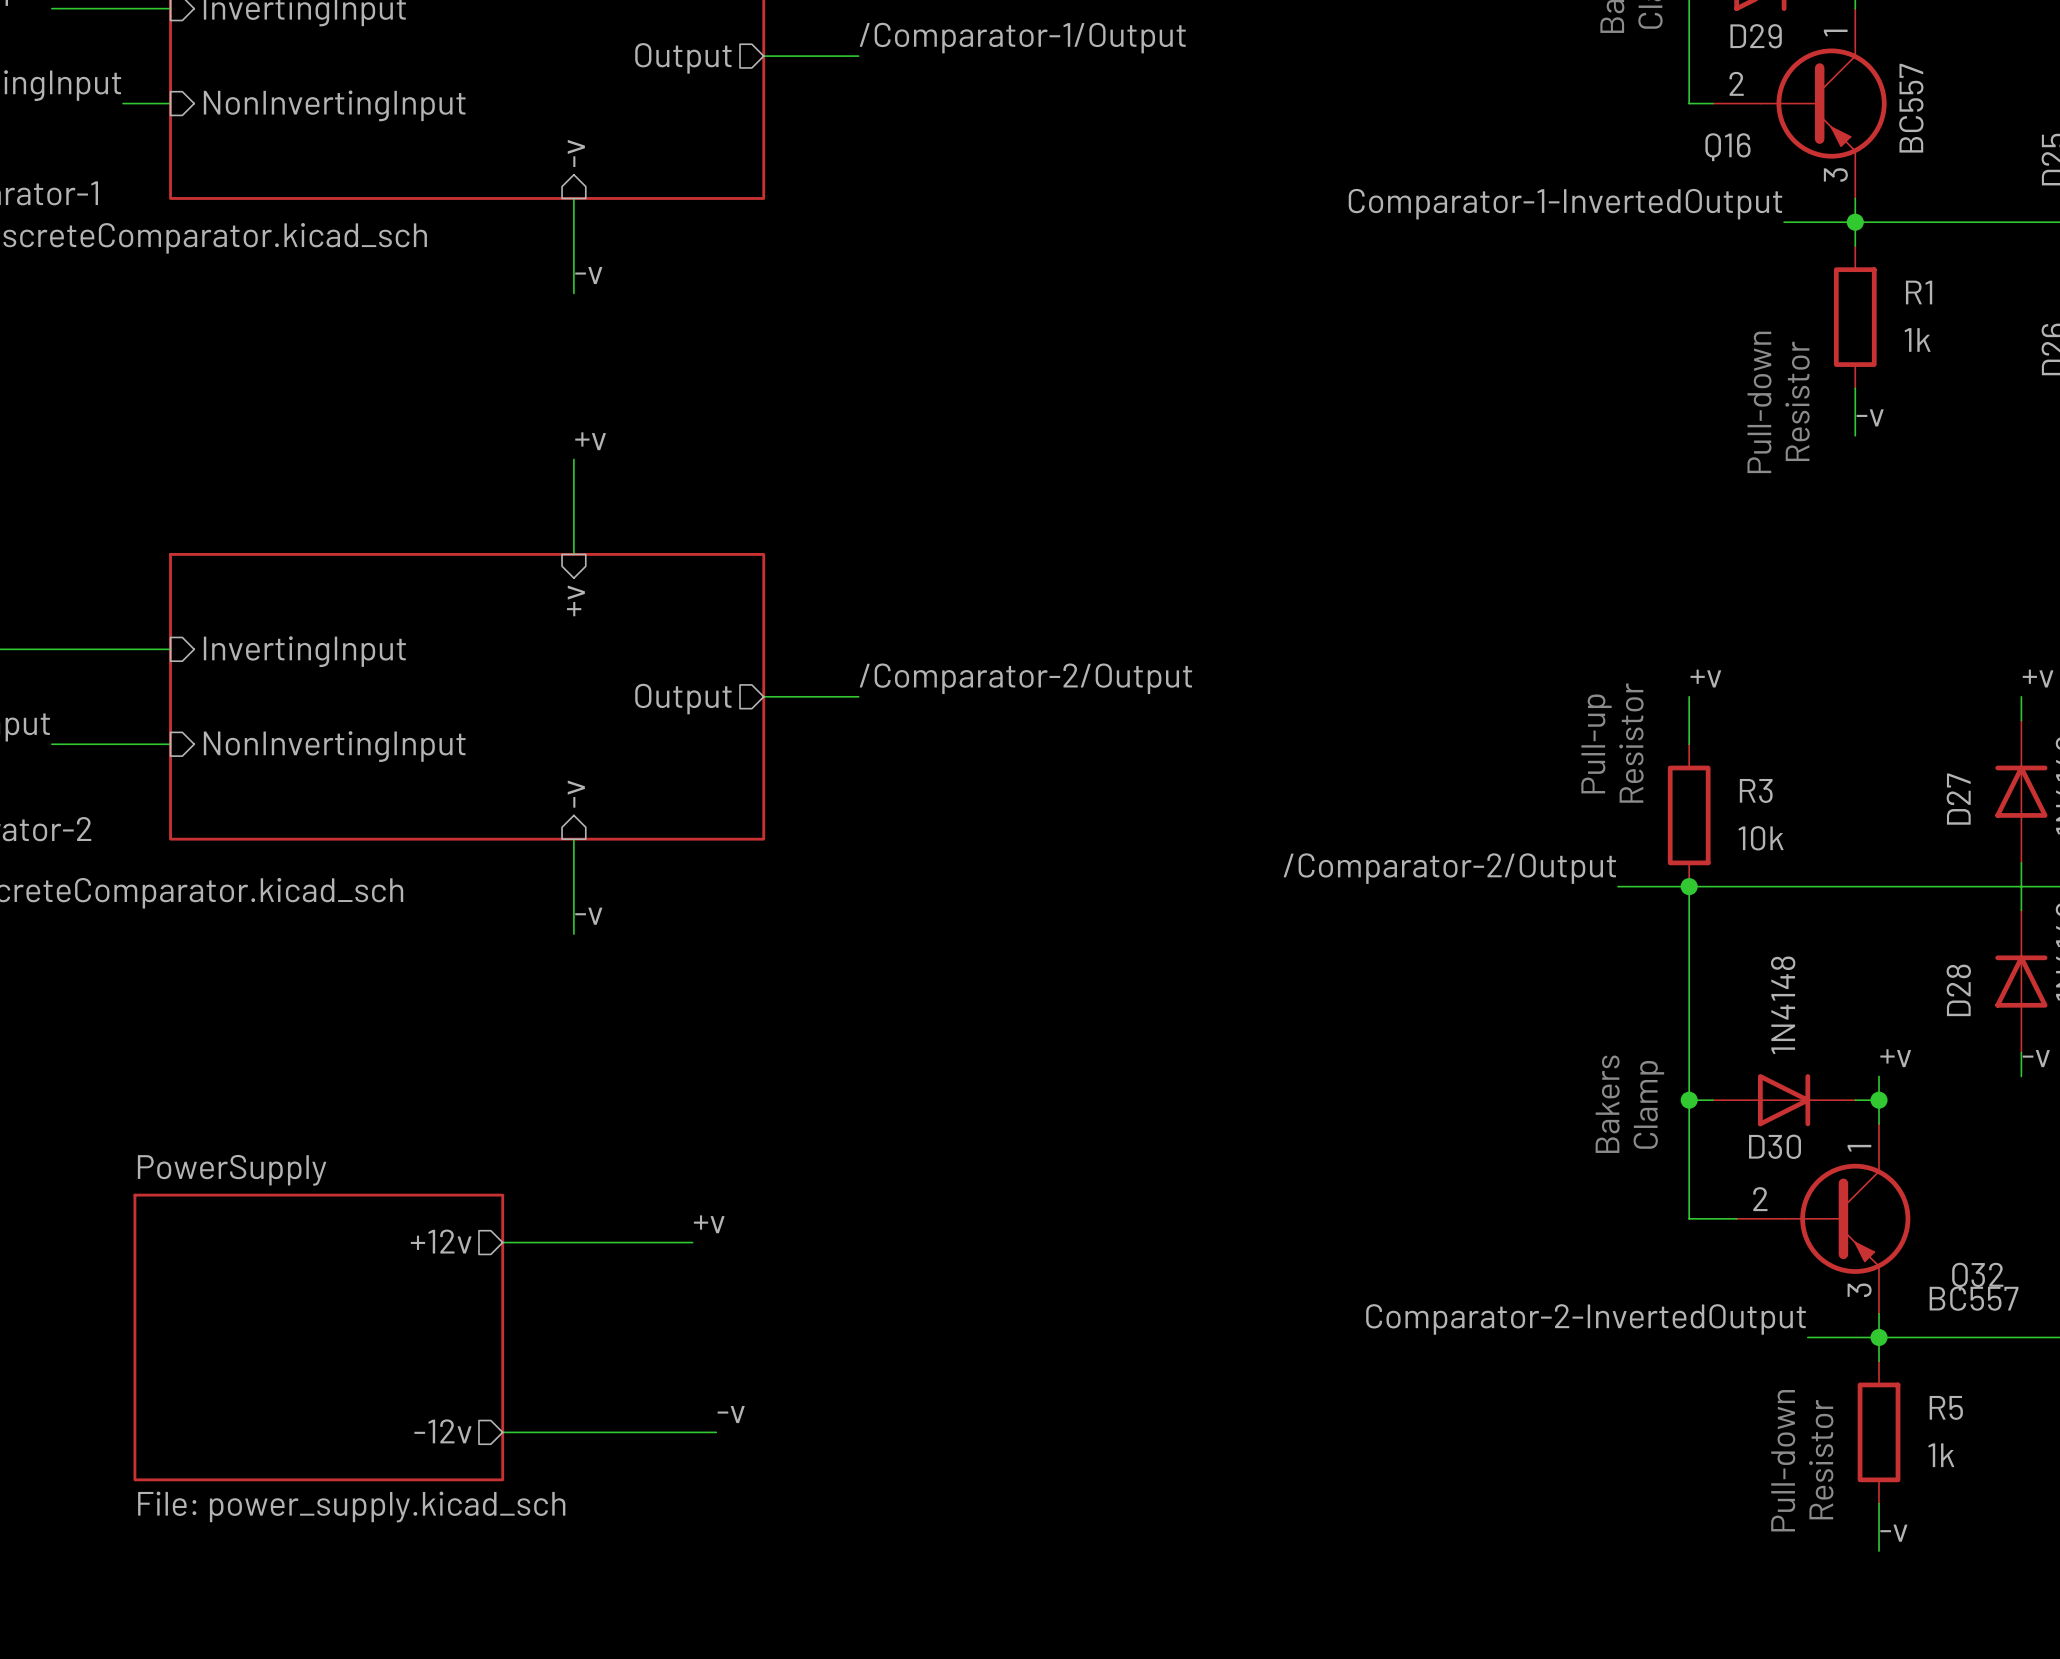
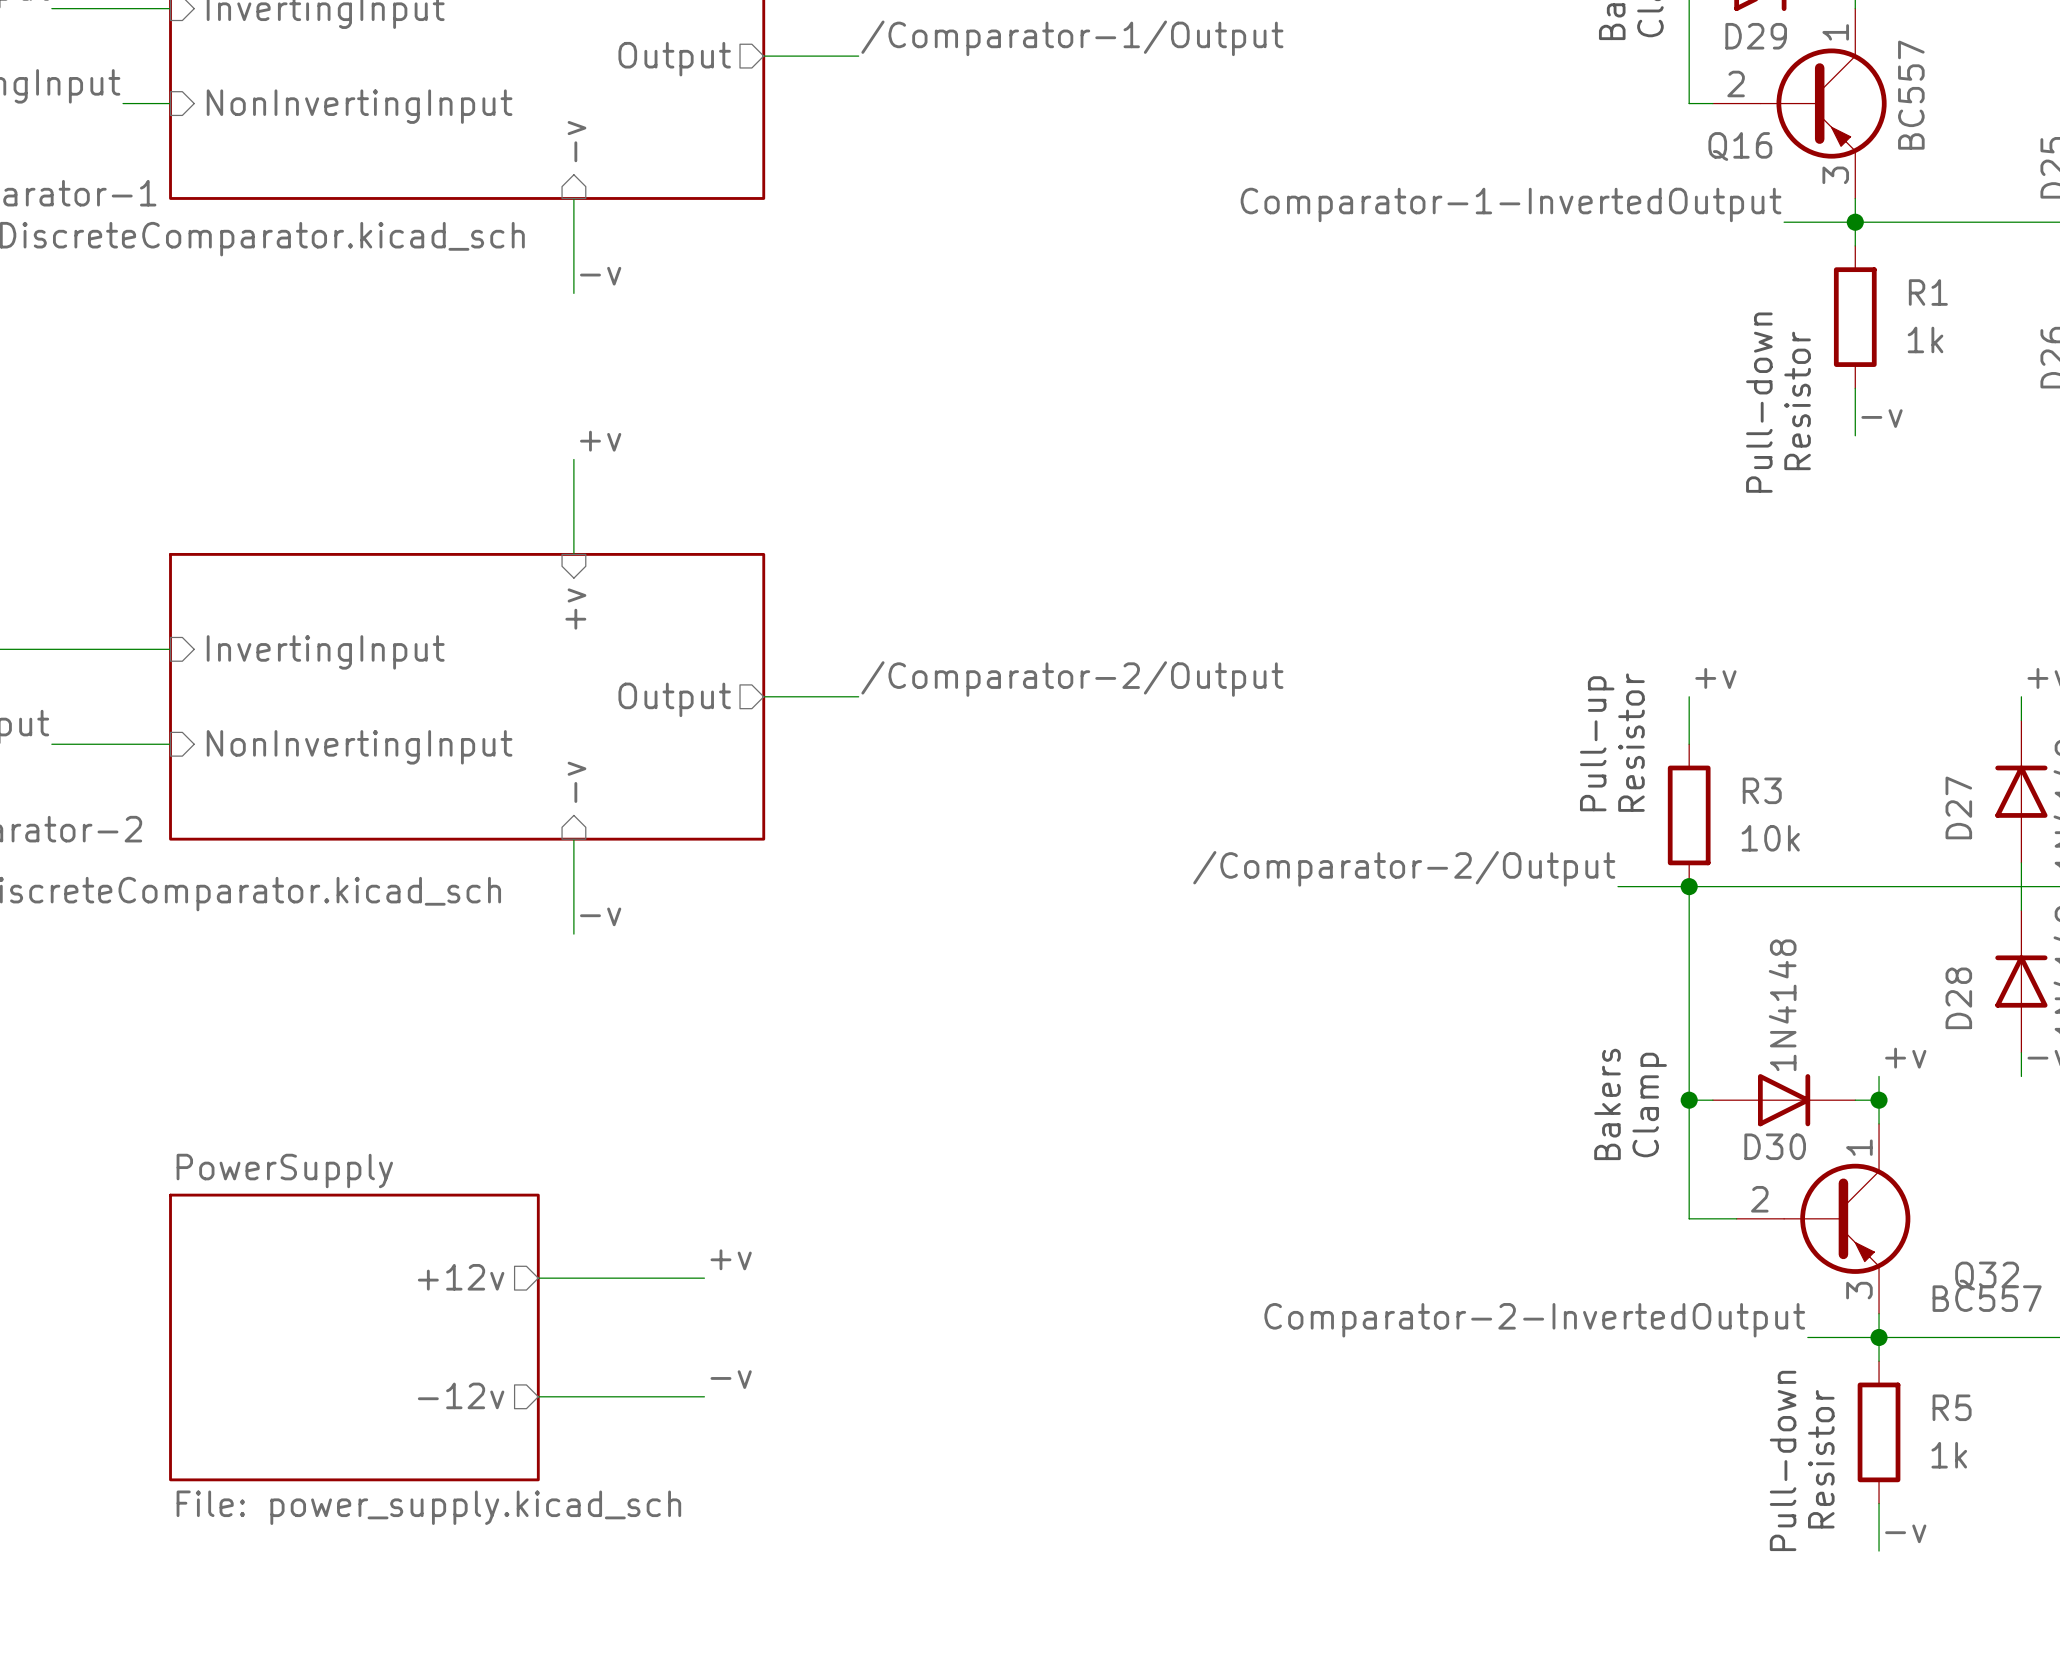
label position: +v (709, 1224) -> +v (731, 1259)
sheet pin position: +12v (441, 1241) -> +12v (461, 1277)
wire: (502, 1242) (692, 1242) -> none
wire: none -> (538, 1278) (704, 1278)
sheet PowerSupply position: (318, 1337) -> (354, 1337)
wire: none -> (538, 1396) (704, 1396)
label position: -v (731, 1414) -> -v (731, 1379)
sheet pin position: -12v (443, 1431) -> -12v (461, 1395)
wire: (502, 1432) (716, 1432) -> none

